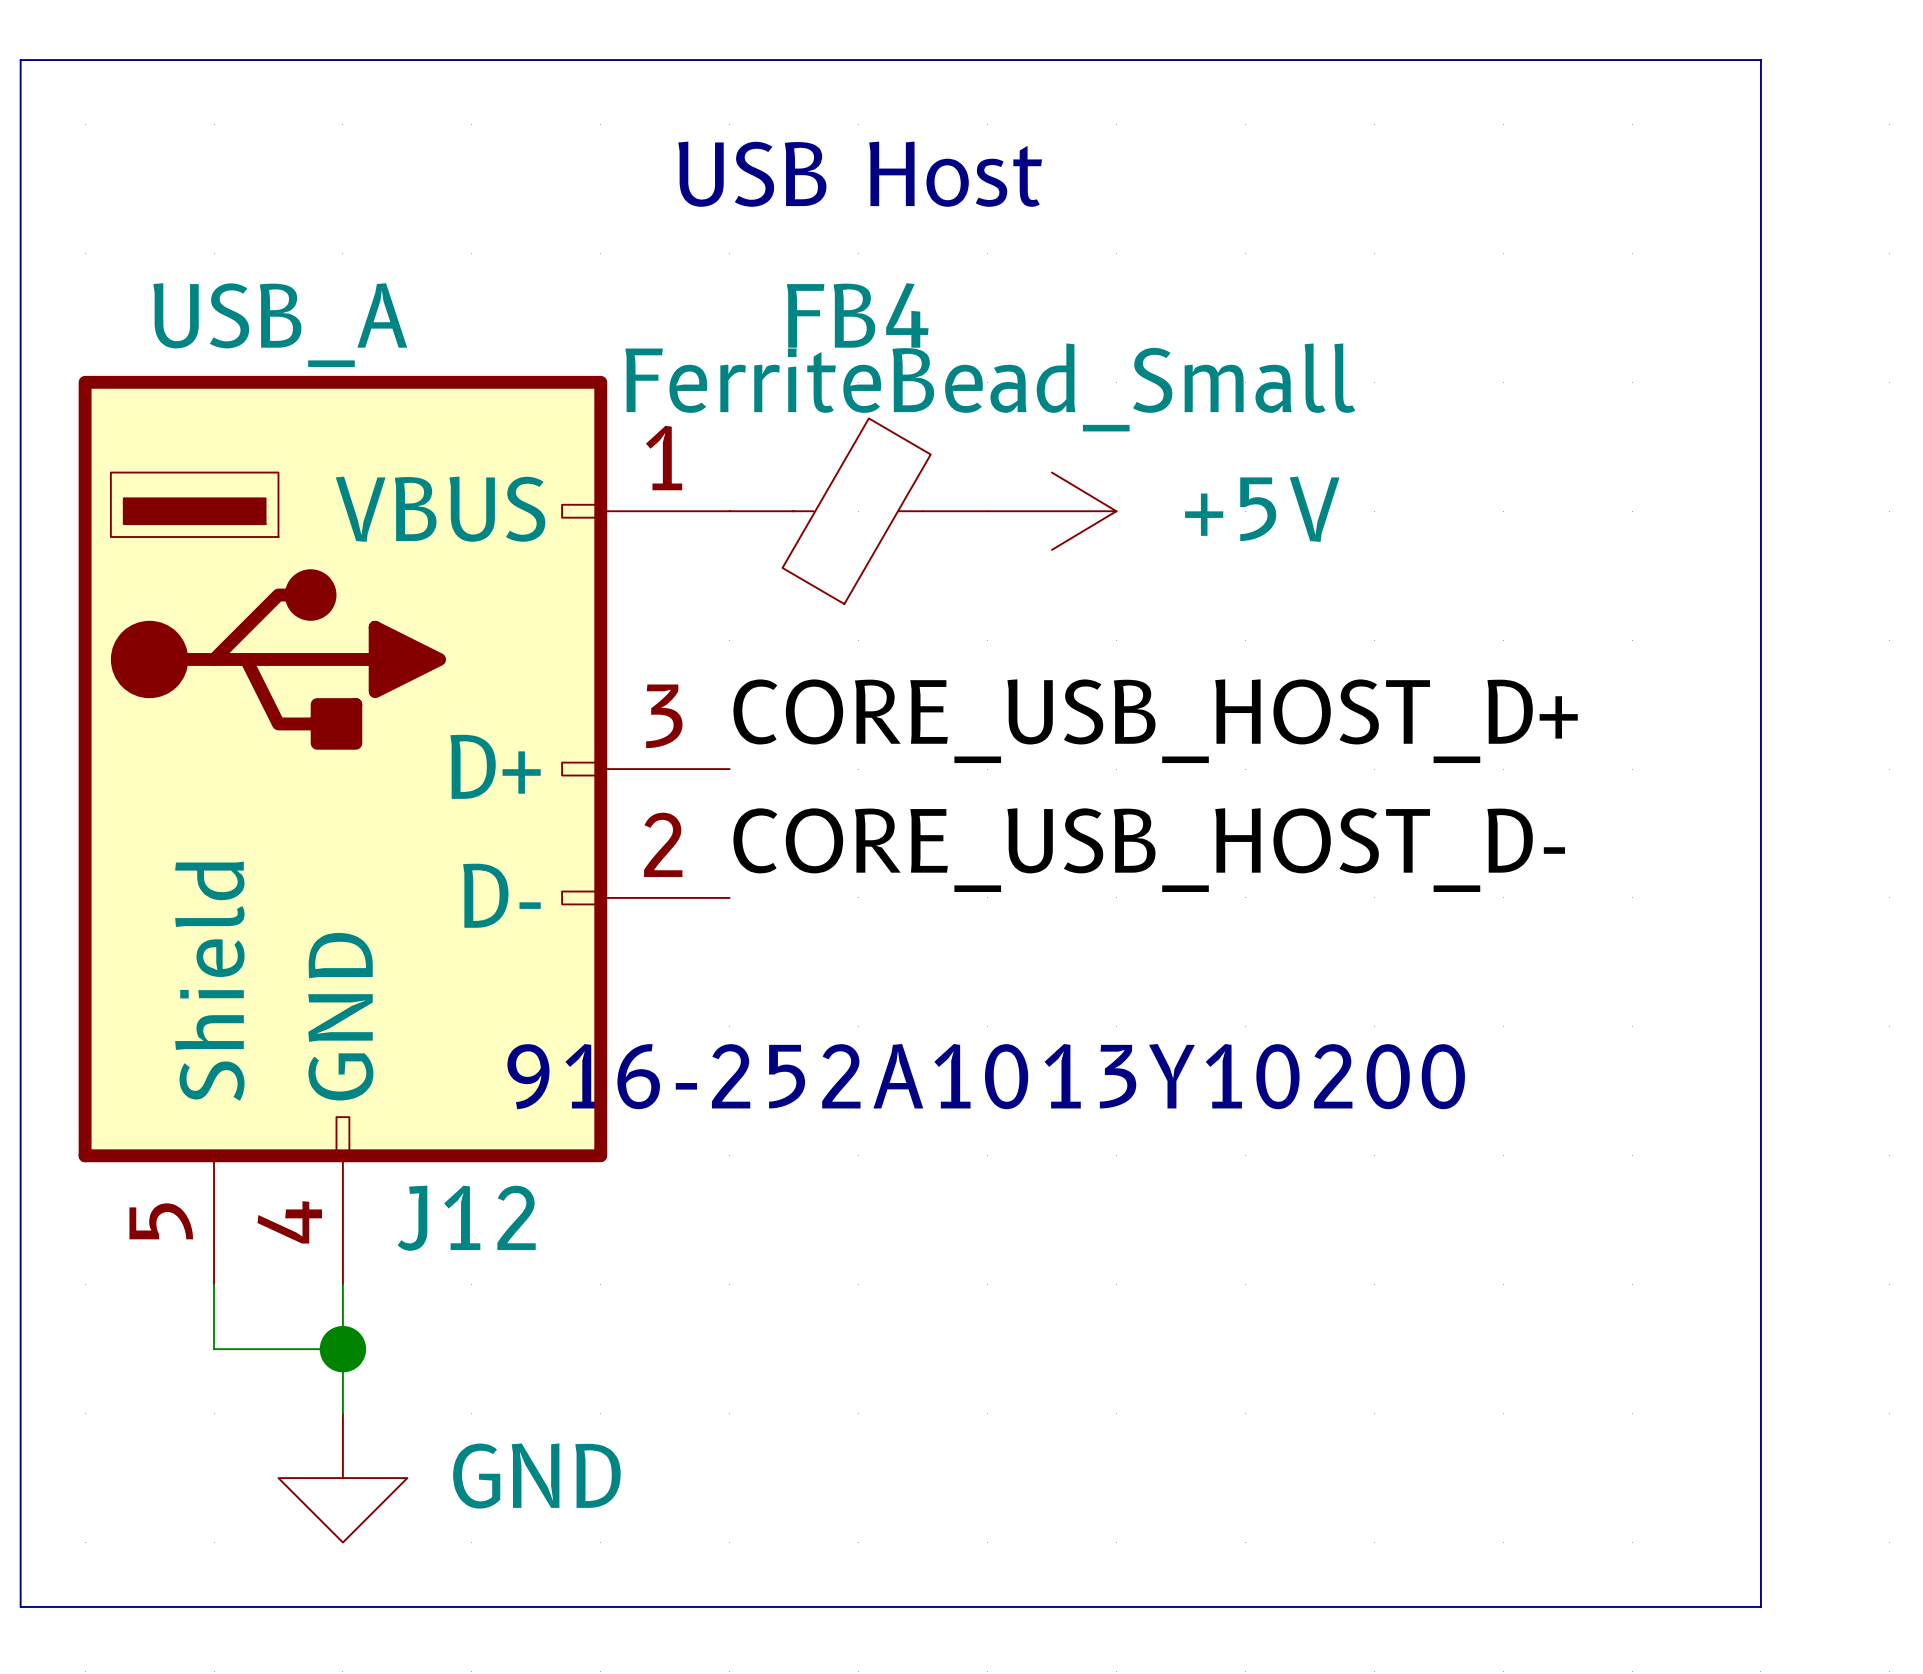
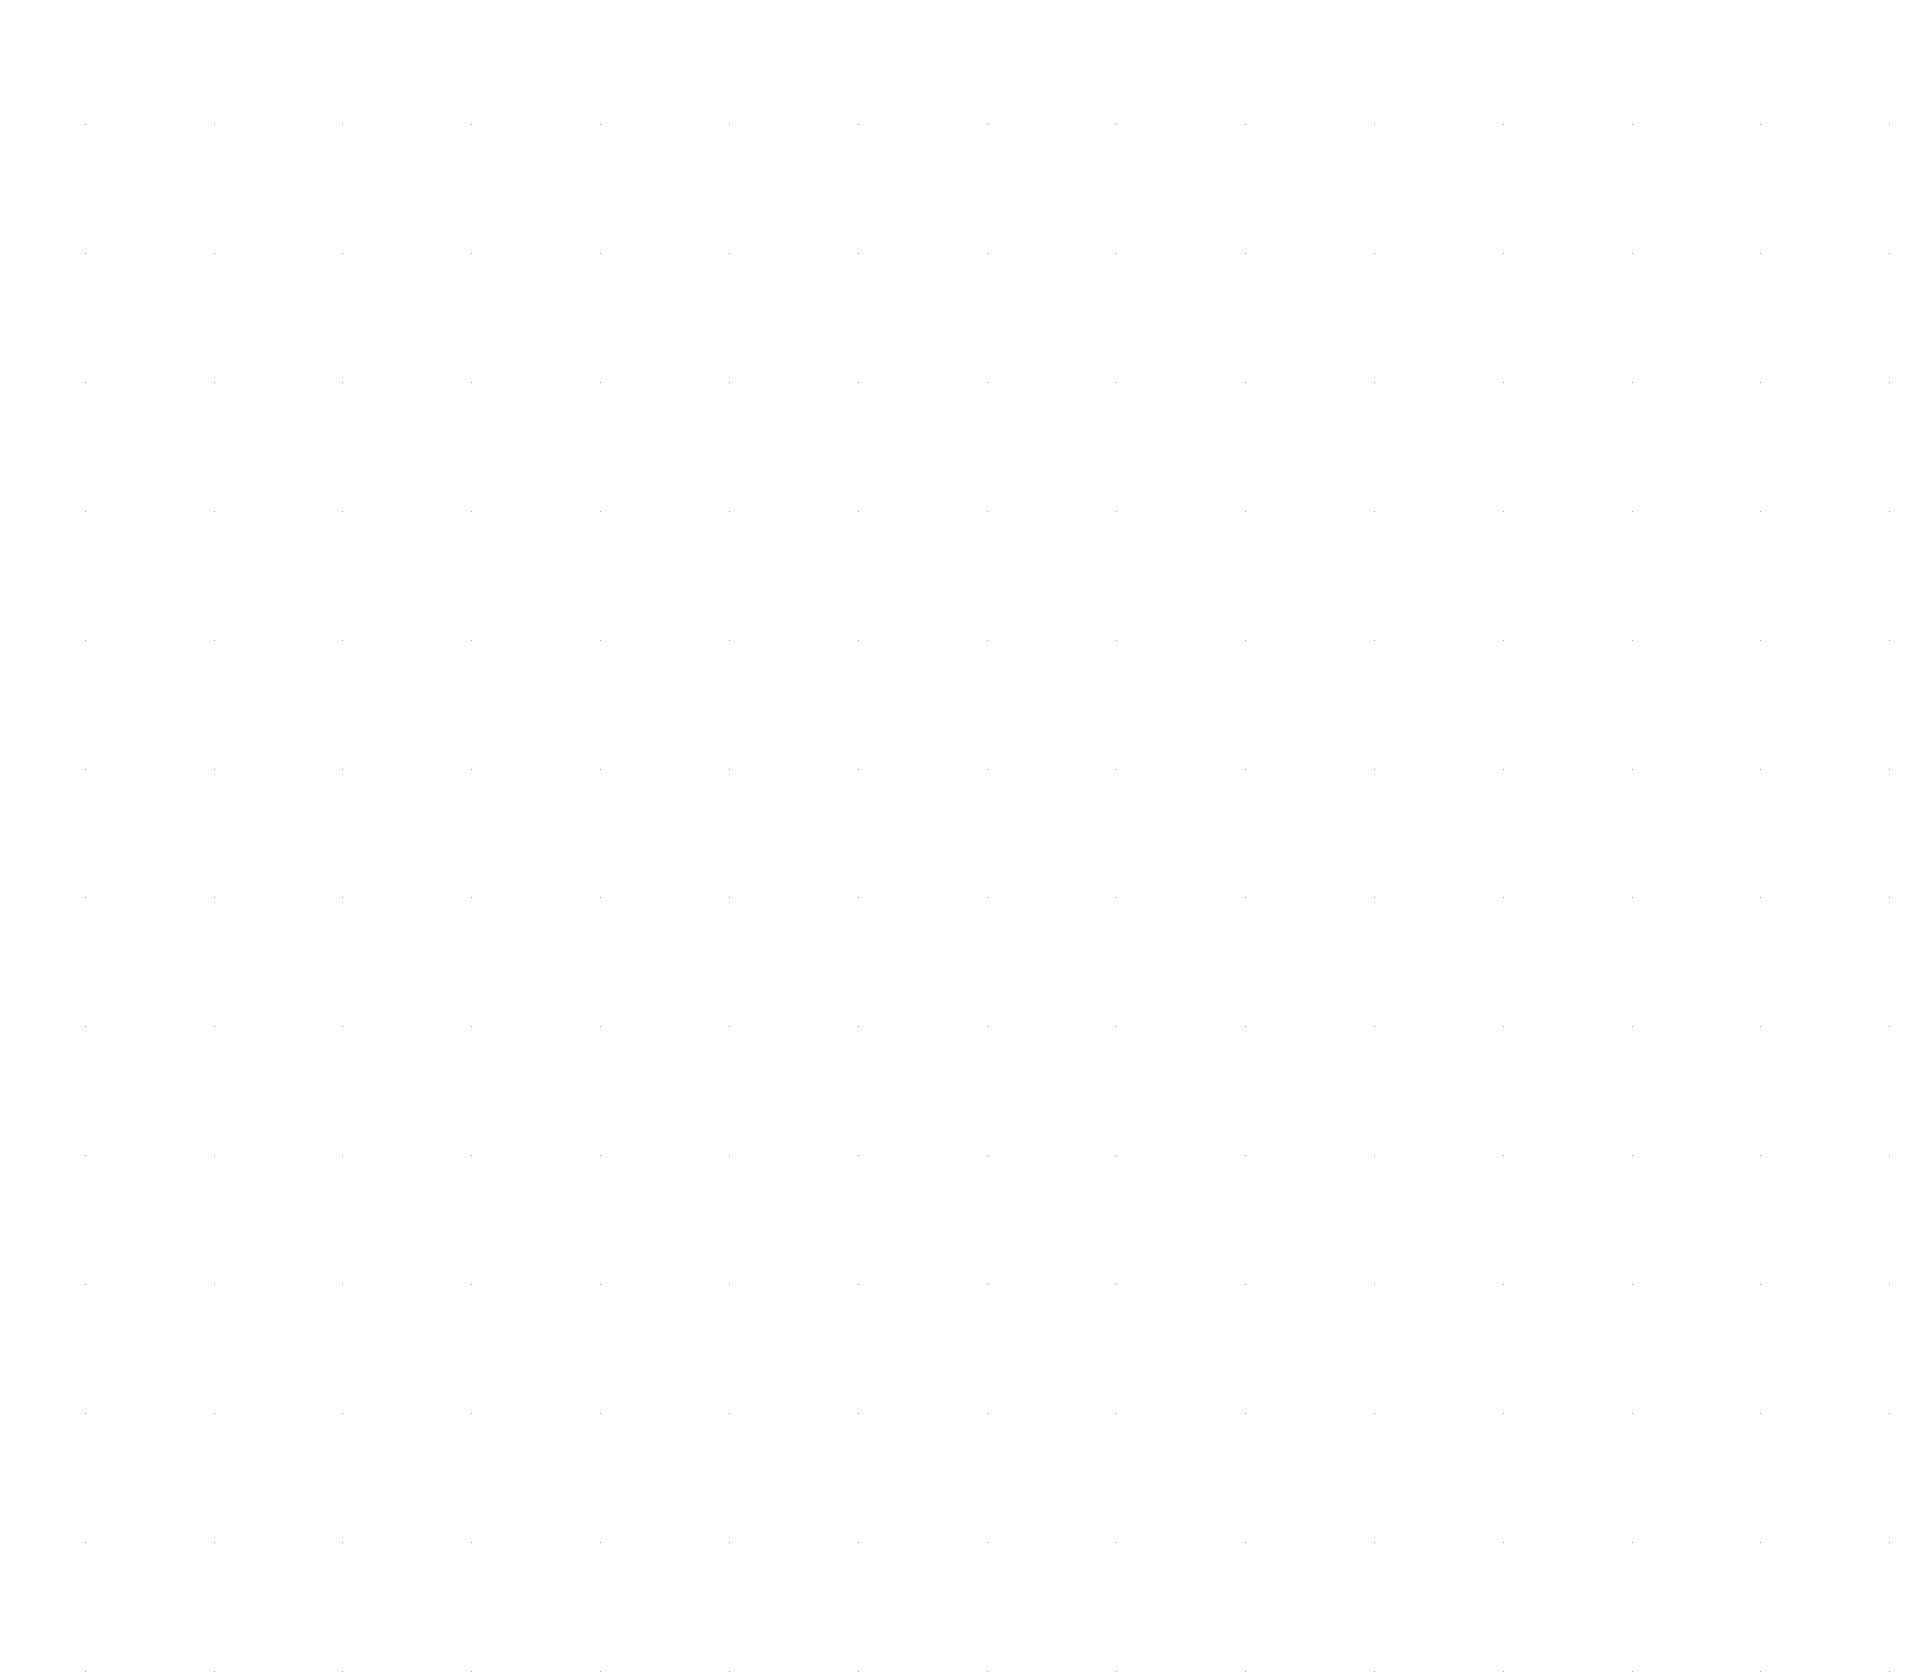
line: (20, 60) (1760, 60) (1760, 1606) (20, 1606) (20, 60) -> none
text: USB Host (860, 174) -> none
FB4: FerriteBead_Small (858, 511) -> none
power symbol: +5V (1051, 511) -> none
label: CORE_USB_HOST_D+ (1155, 721) -> none
J12: USB_A (404, 830) -> none
label: CORE_USB_HOST_D- (1149, 850) -> none
text: 916-252A1013Y10200 (986, 1076) -> none
wire: (214, 1284) (214, 1349) (342, 1349) -> none
wire: (342, 1284) (342, 1413) -> none
junction: (342, 1349) -> none
power symbol: GND (342, 1478) -> none

